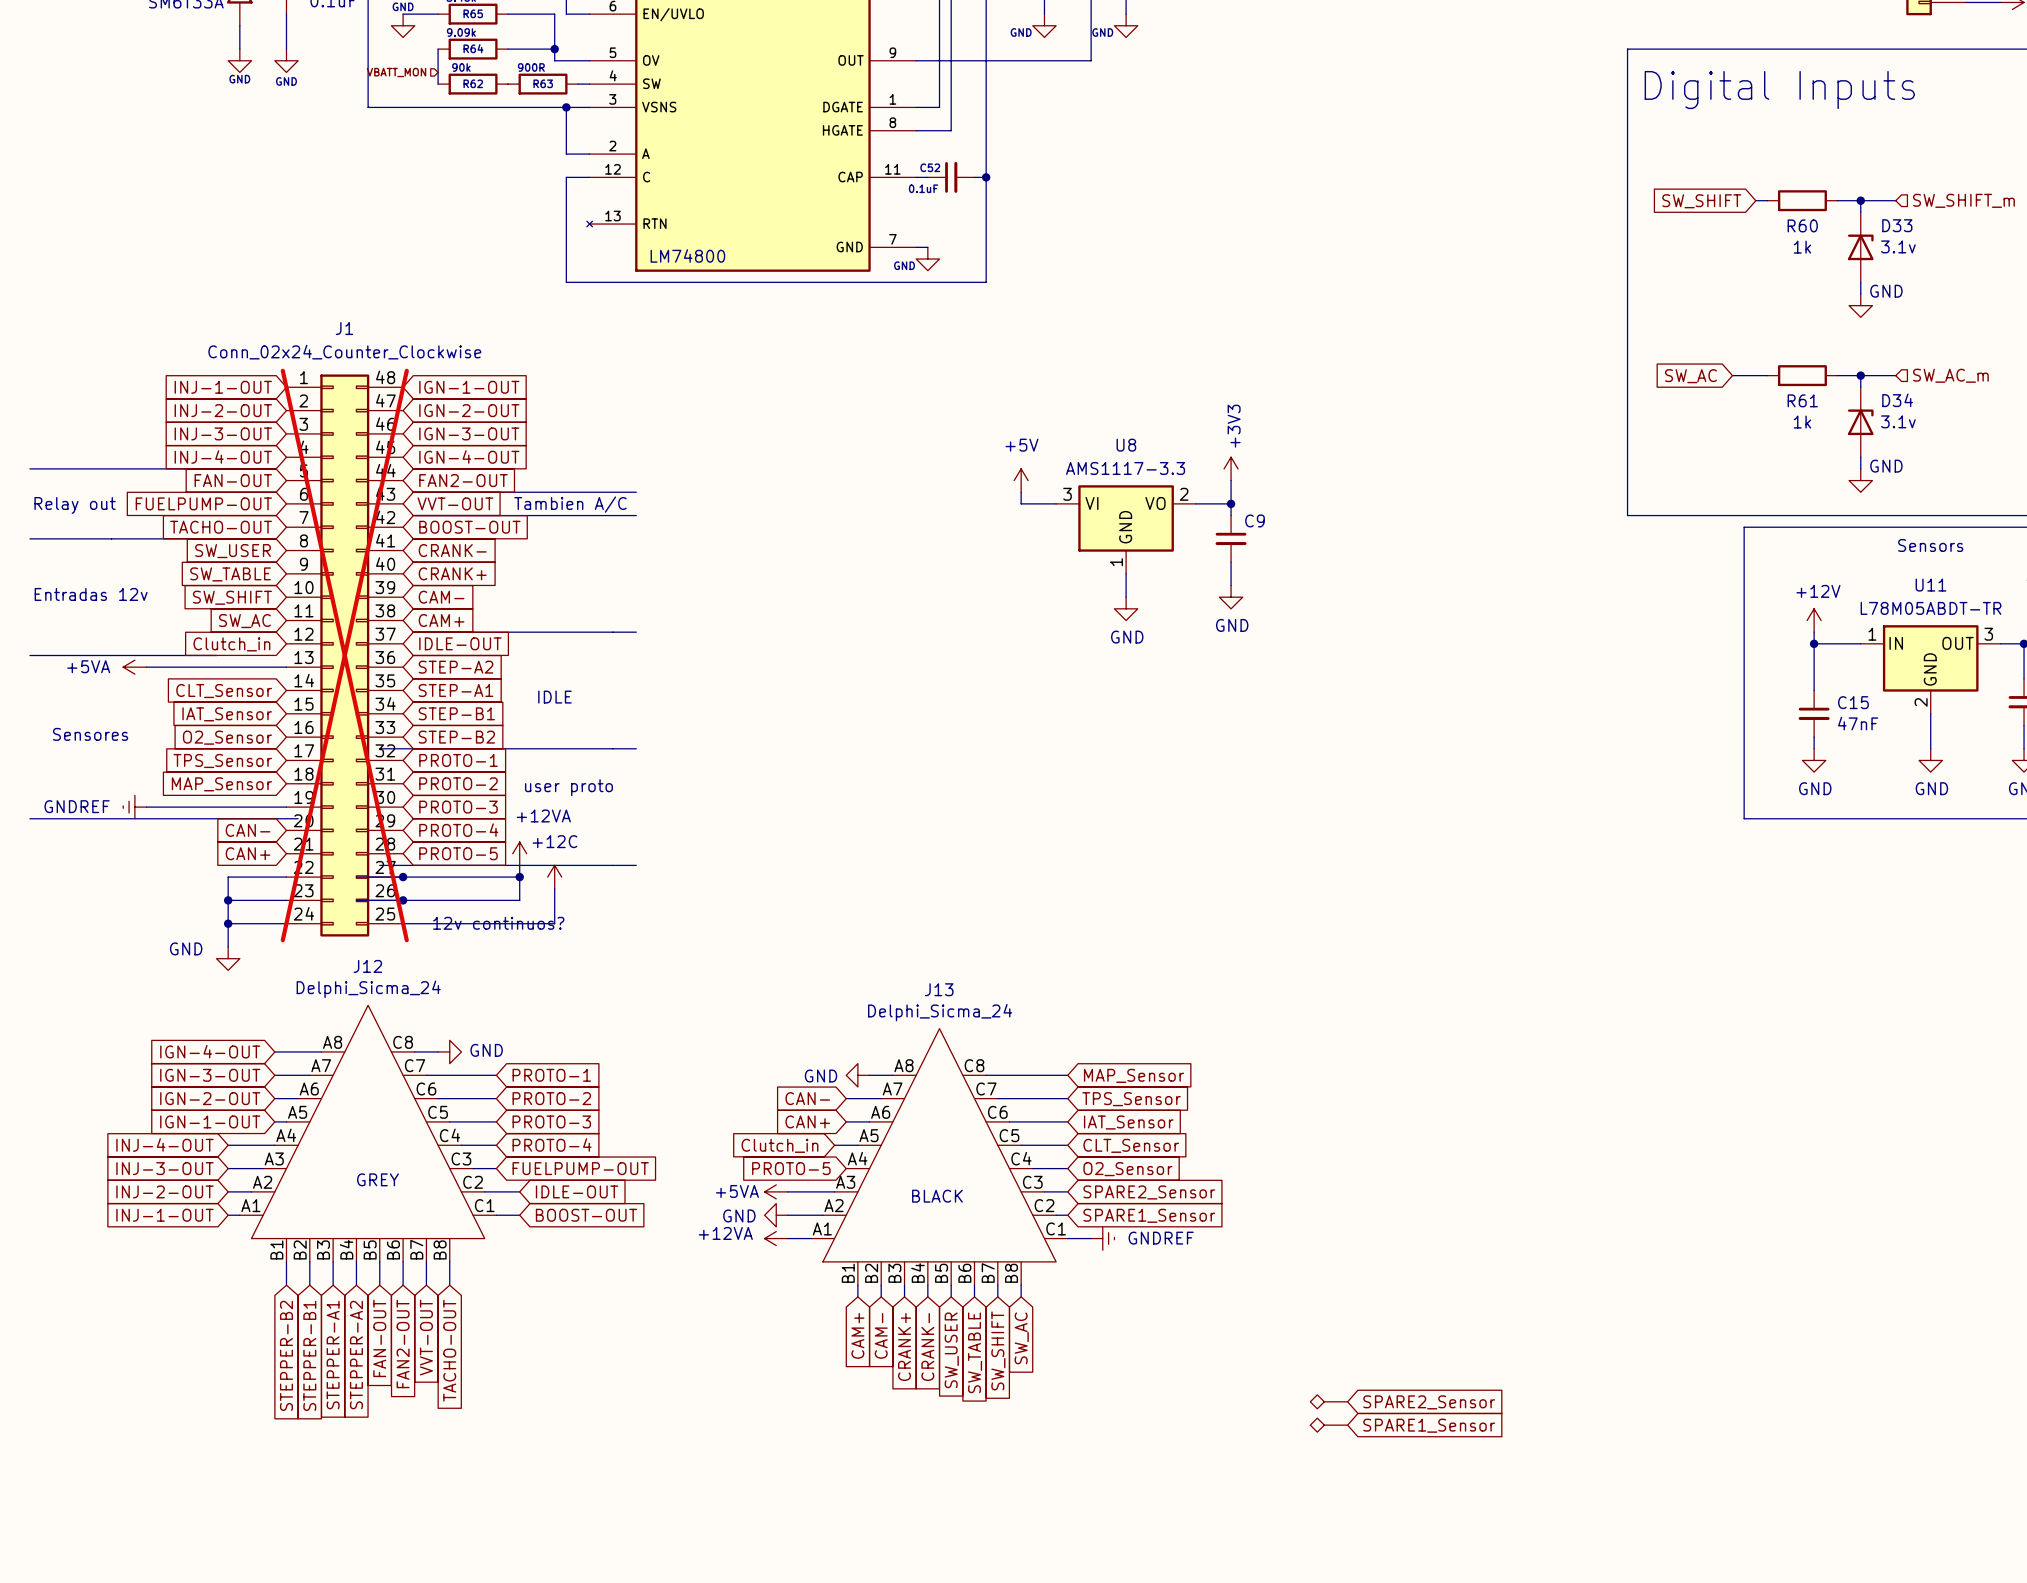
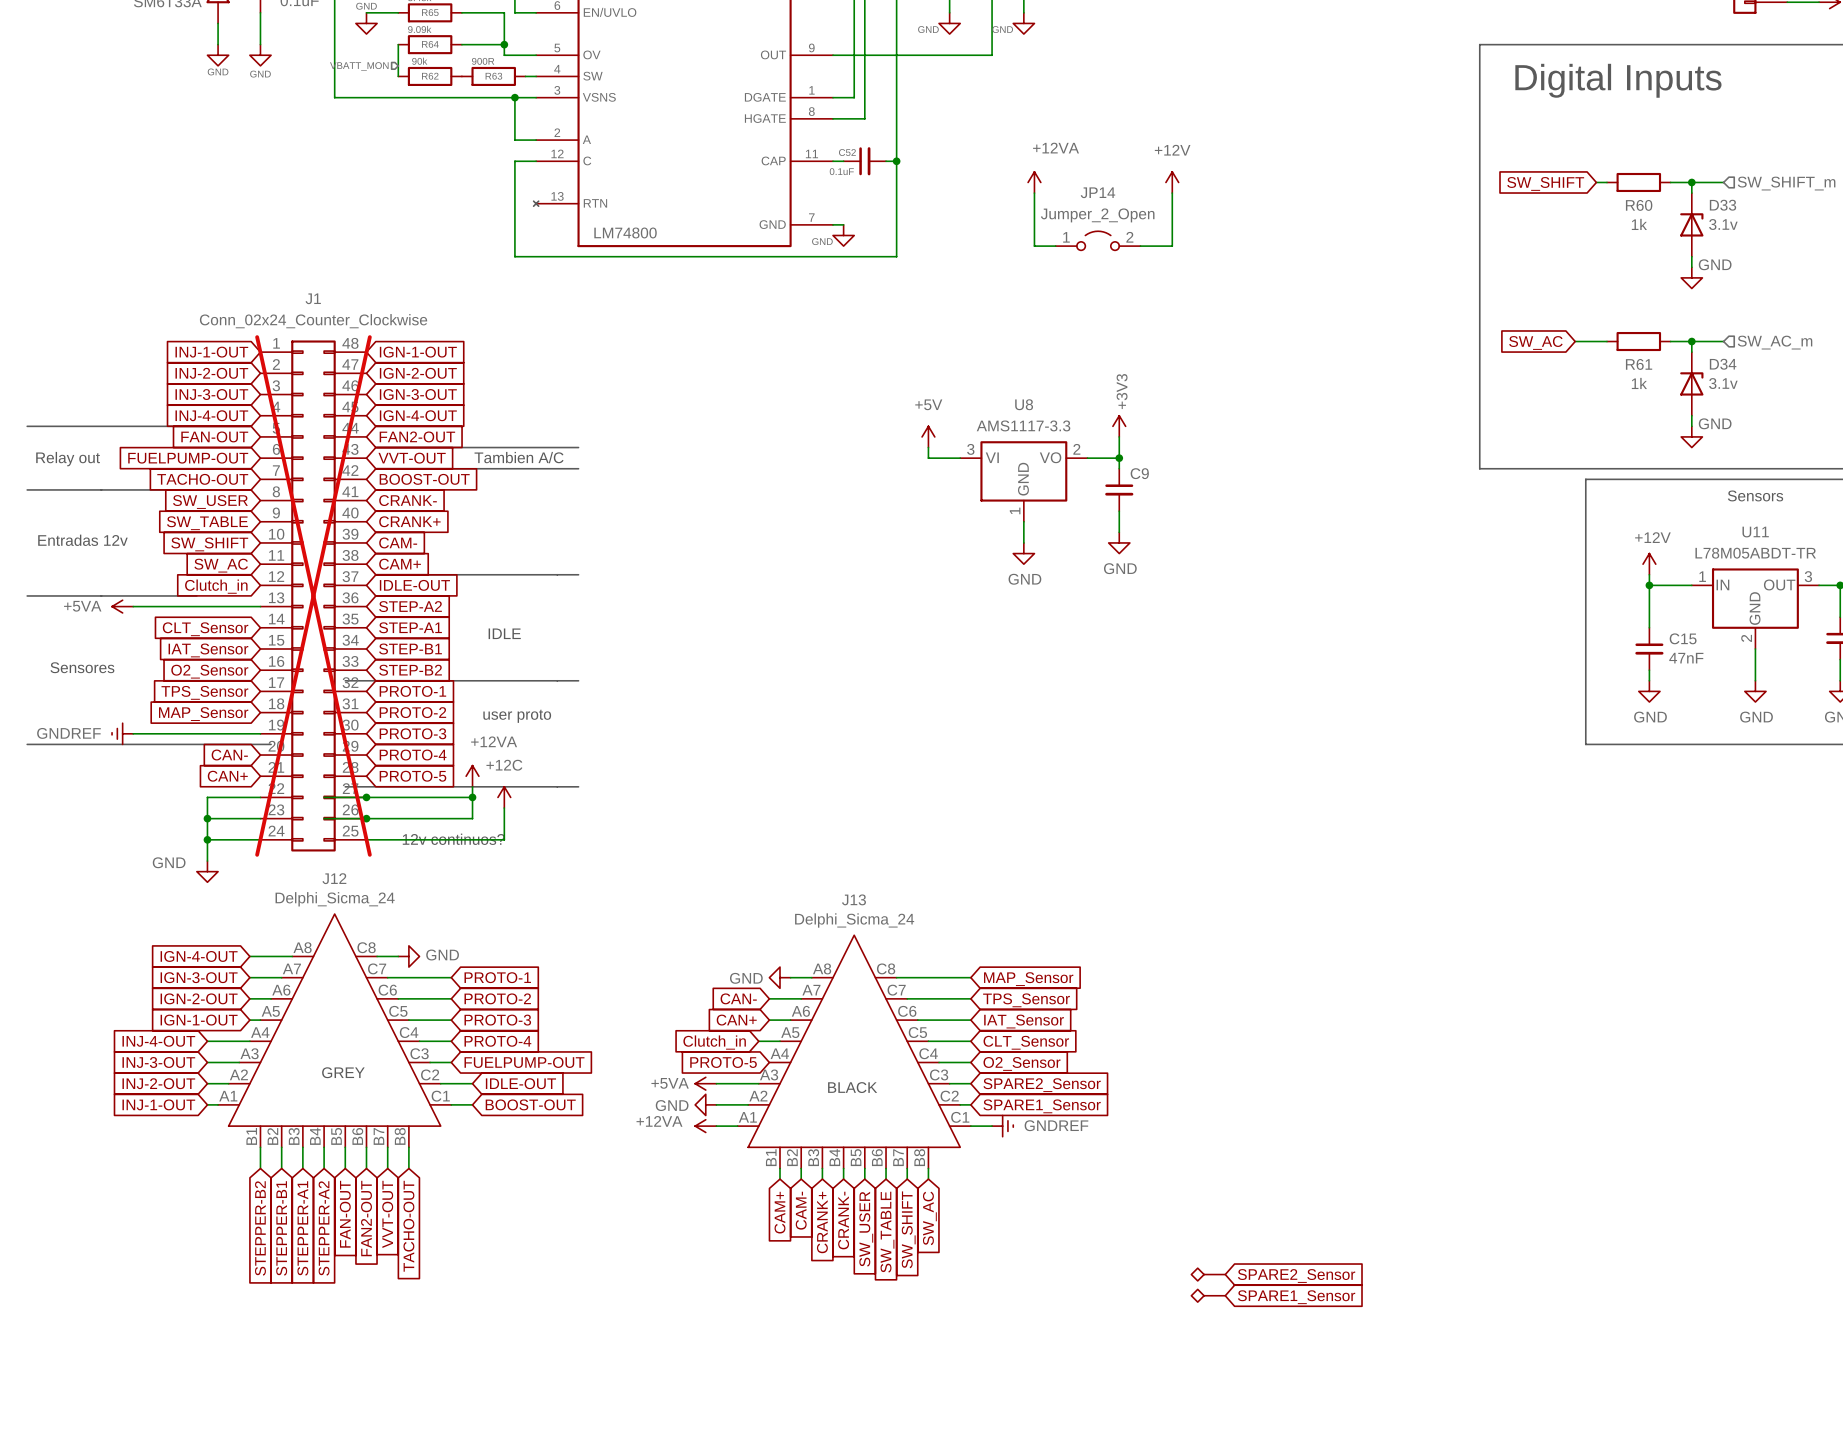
power symbol: none -> +12VA (1034, 182)
power symbol: none -> +12V (1172, 182)
wire: none -> (1034, 193) (1034, 246) (1055, 246)
wire: none -> (1172, 193) (1172, 246) (1140, 246)
JP14: none -> Jumper_2_Open (1098, 240)

